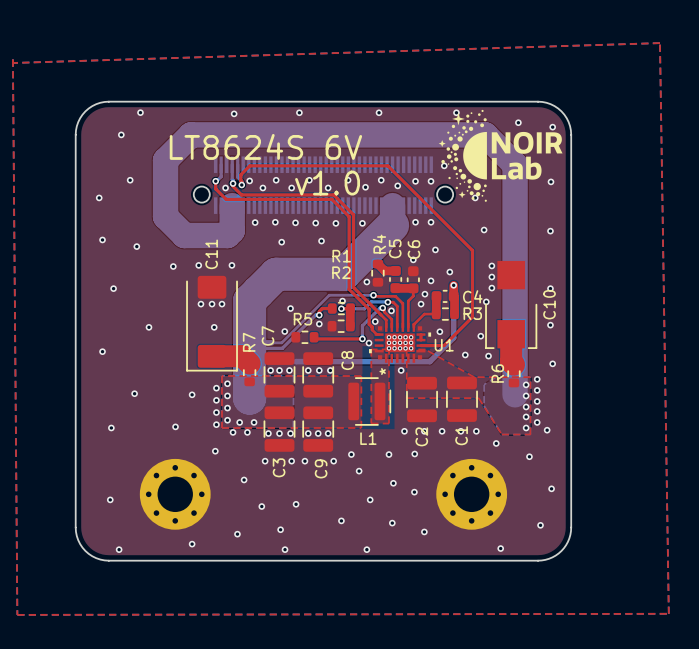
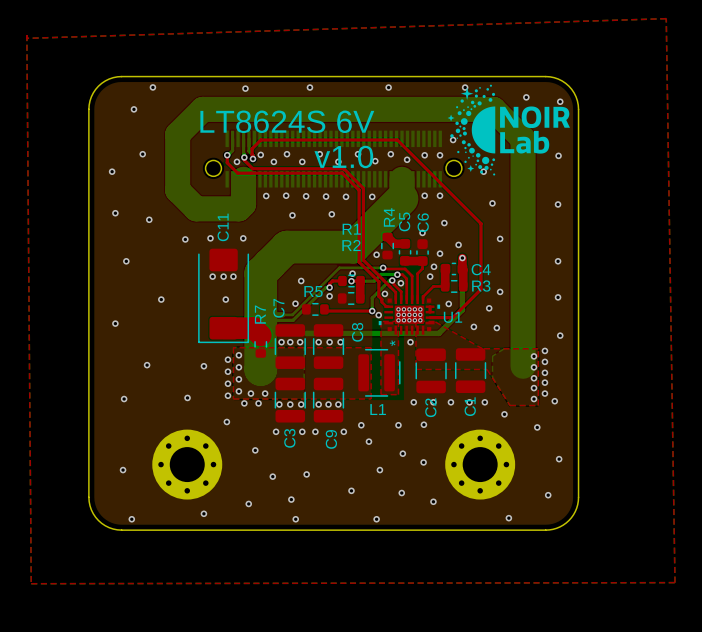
via: (491, 277) -> none
via: (491, 288) -> none
via: (486, 301) -> none
C10: (511, 304) -> none
via: none -> (500, 291)
top track: (511, 334) (511, 361) (513, 364) -> none
R6: (513, 373) -> none

